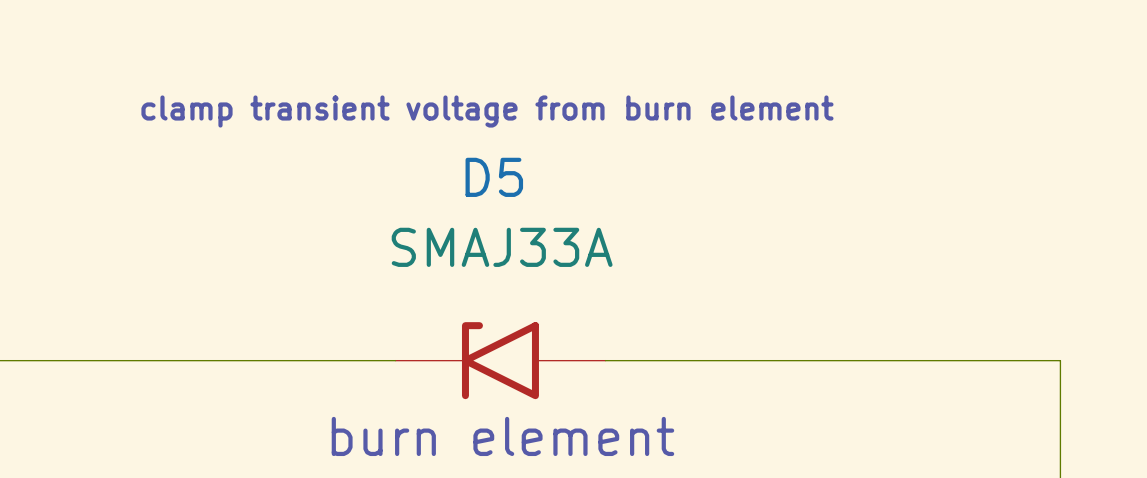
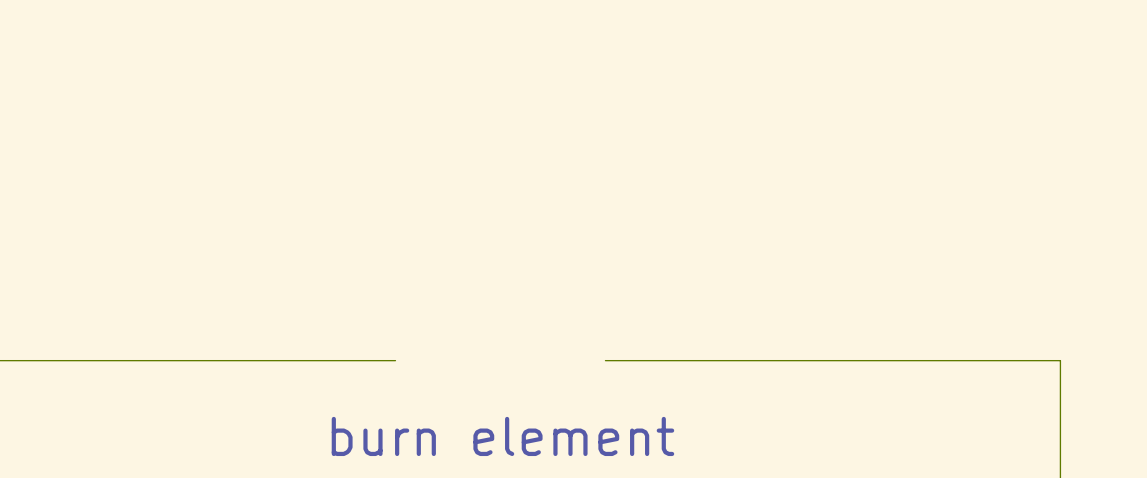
text: clamp transient voltage from burn element (487, 111) -> none
D5: SMAJ33A (500, 360) -> none

